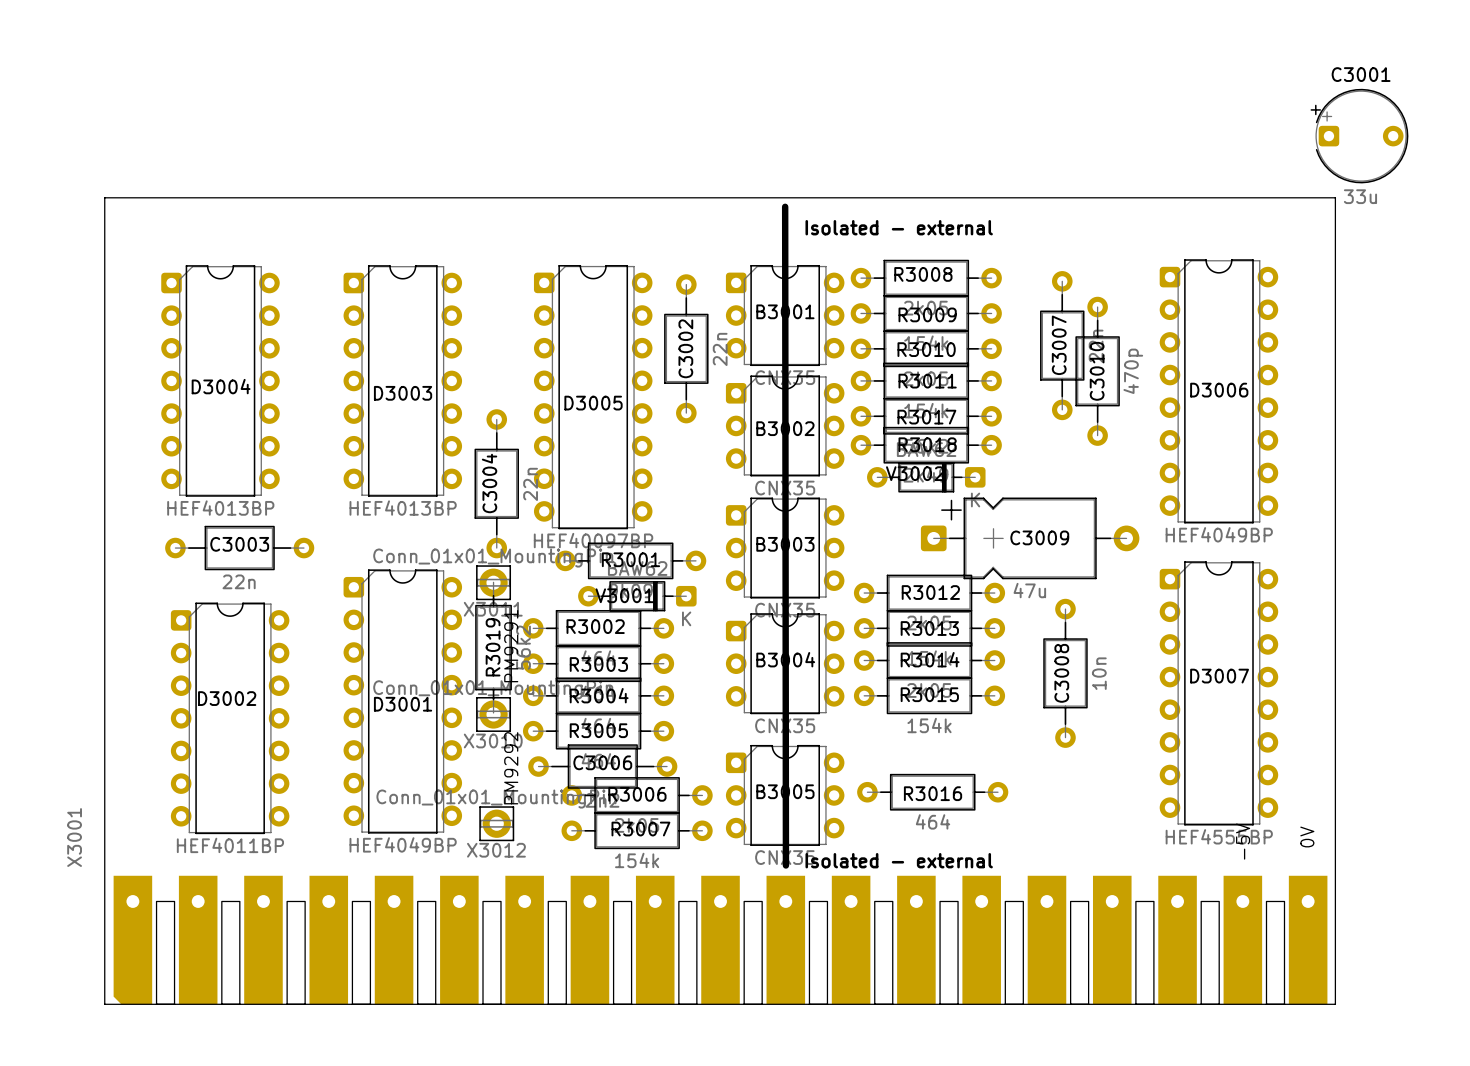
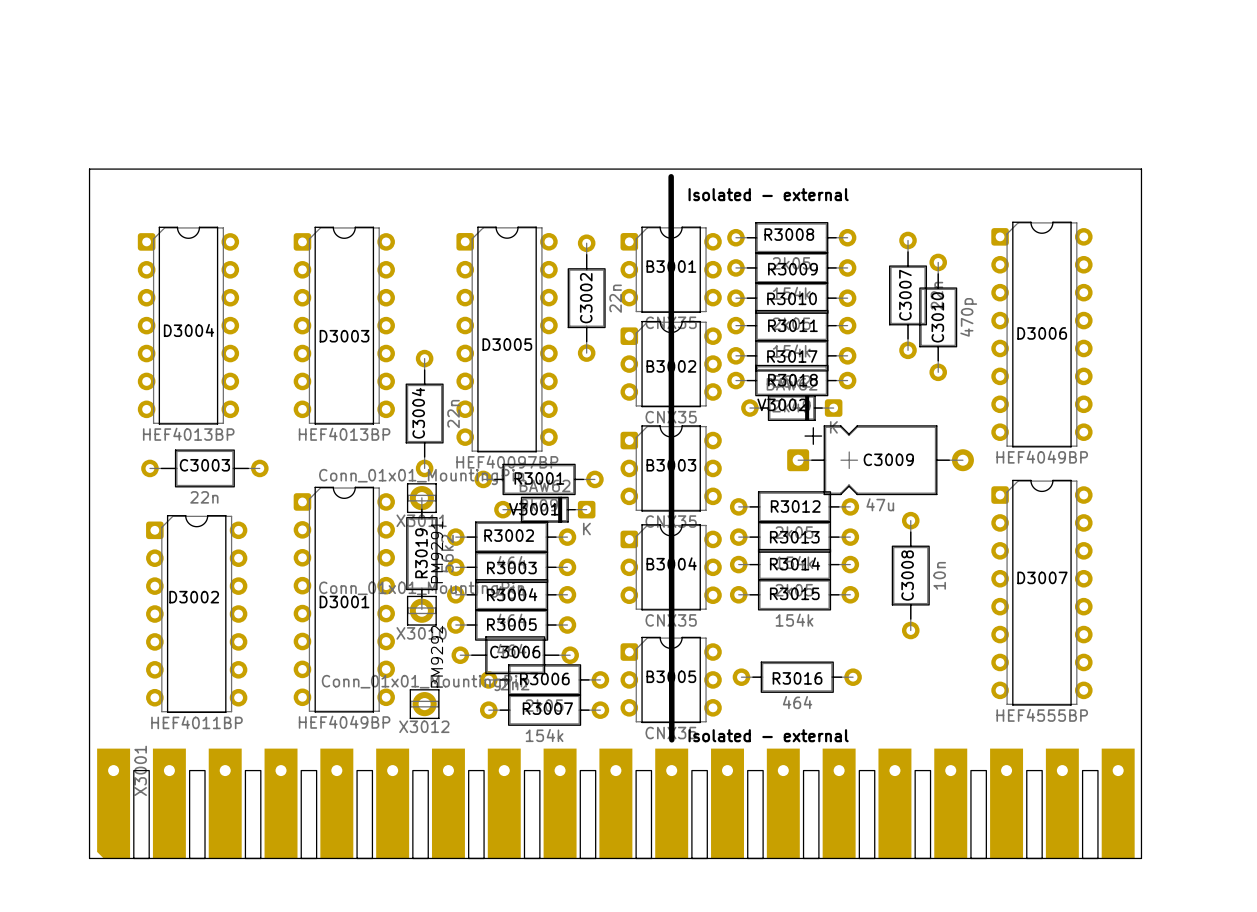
C3001: 33u (1359, 136) -> none
X3001 text: 0V (1307, 836) -> none
X3001 name position: X3001 (74, 837) -> X3001 (140, 770)
X3001 text: -5V (1243, 841) -> none

